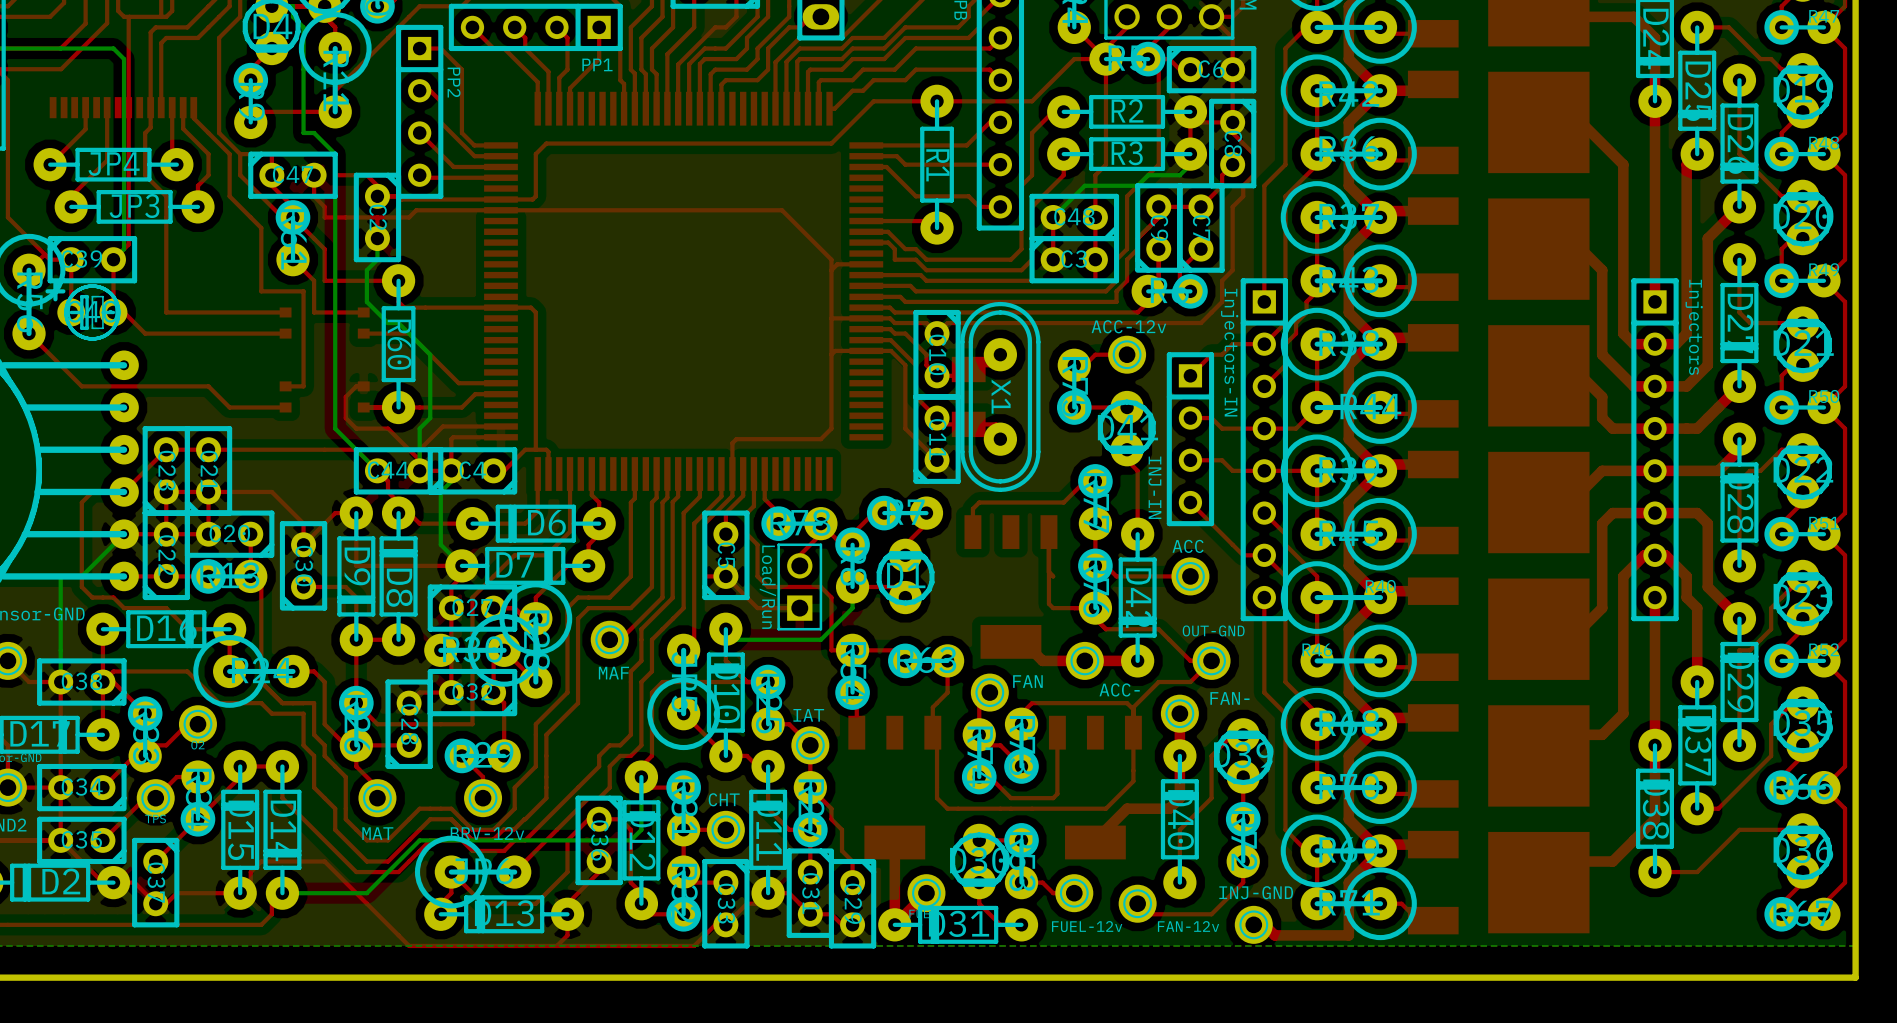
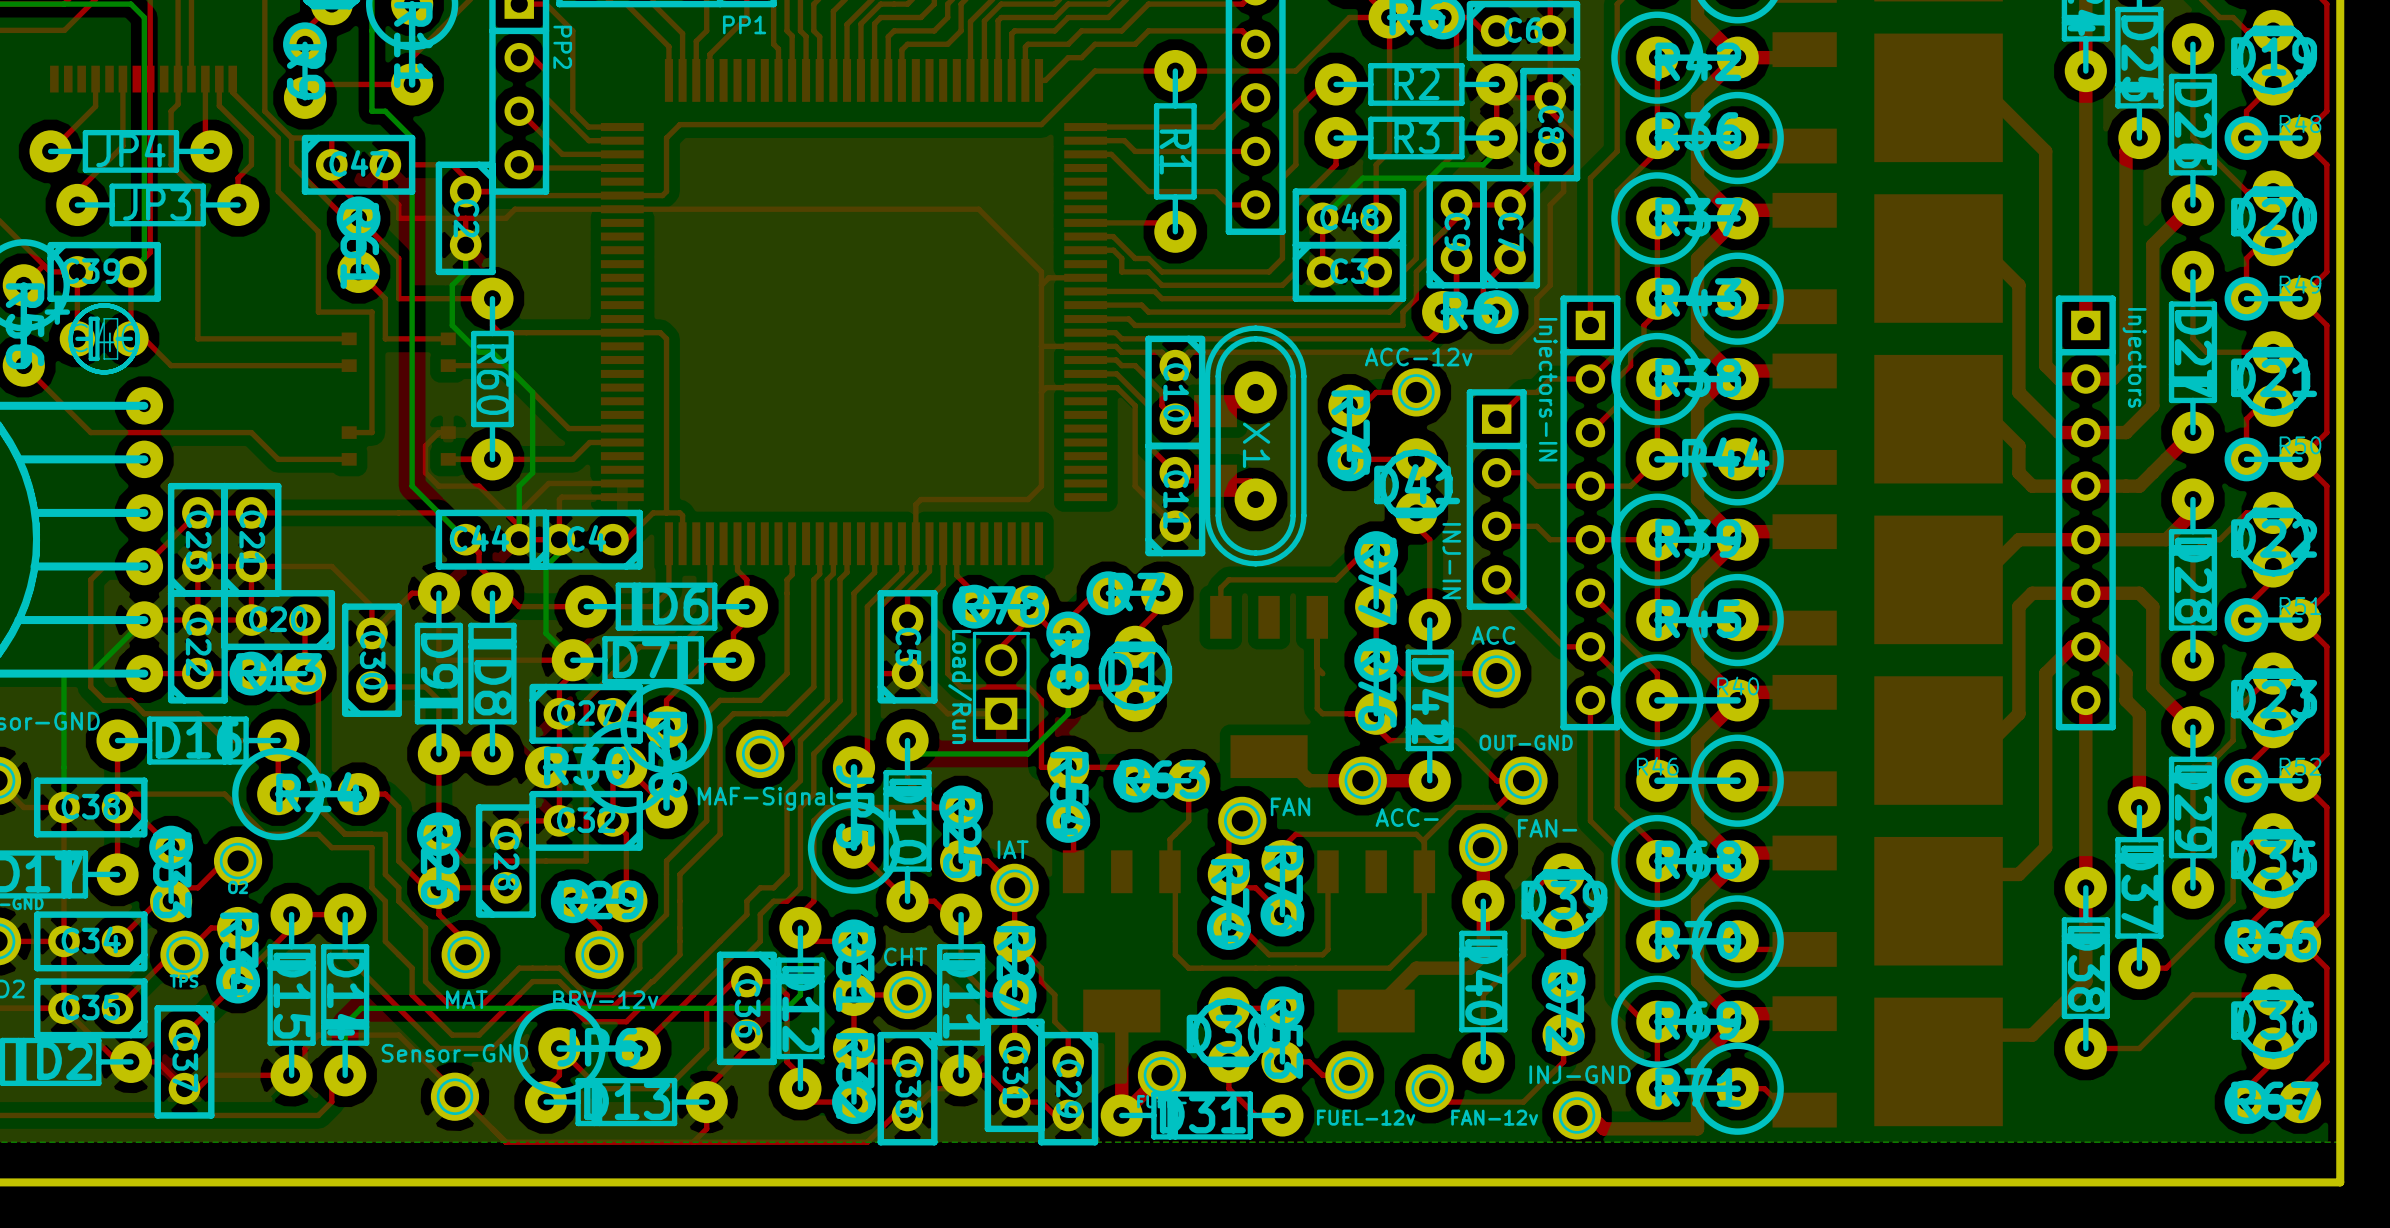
part value: MAF (613, 673) -> MAF-Signal (766, 798)
bottom track: (419, 840) (366, 893) (282, 893) -> (519, 1008) (361, 1008) (345, 1024) (345, 1075)
part: none -> Sensor-GND (454, 1096)

